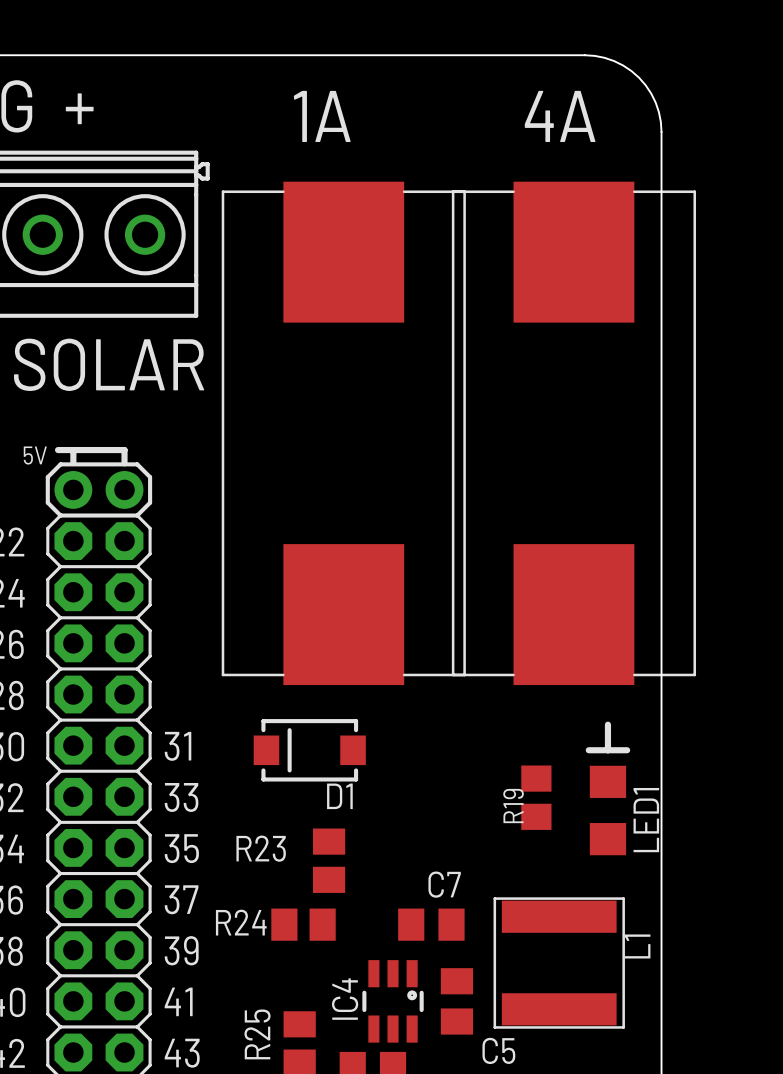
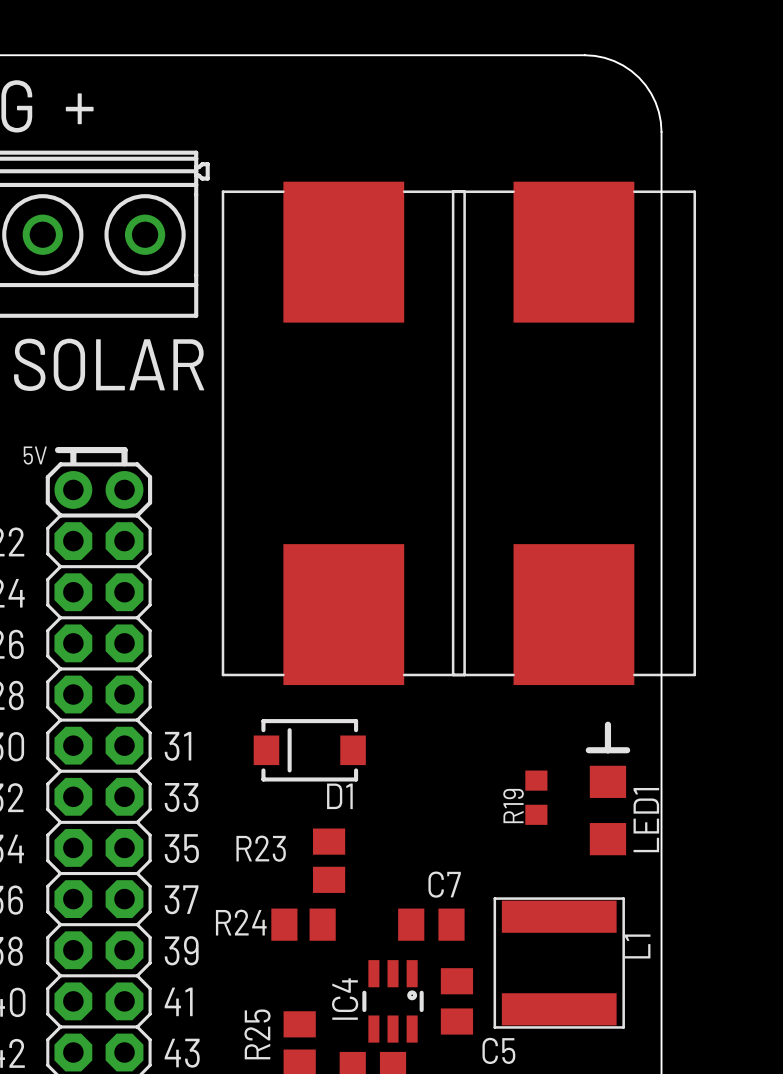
text: 1A (322, 116) -> none
text: 4A (560, 116) -> none
R19 footprint: [521, 765, 552, 830] -> [525, 770, 548, 825]

